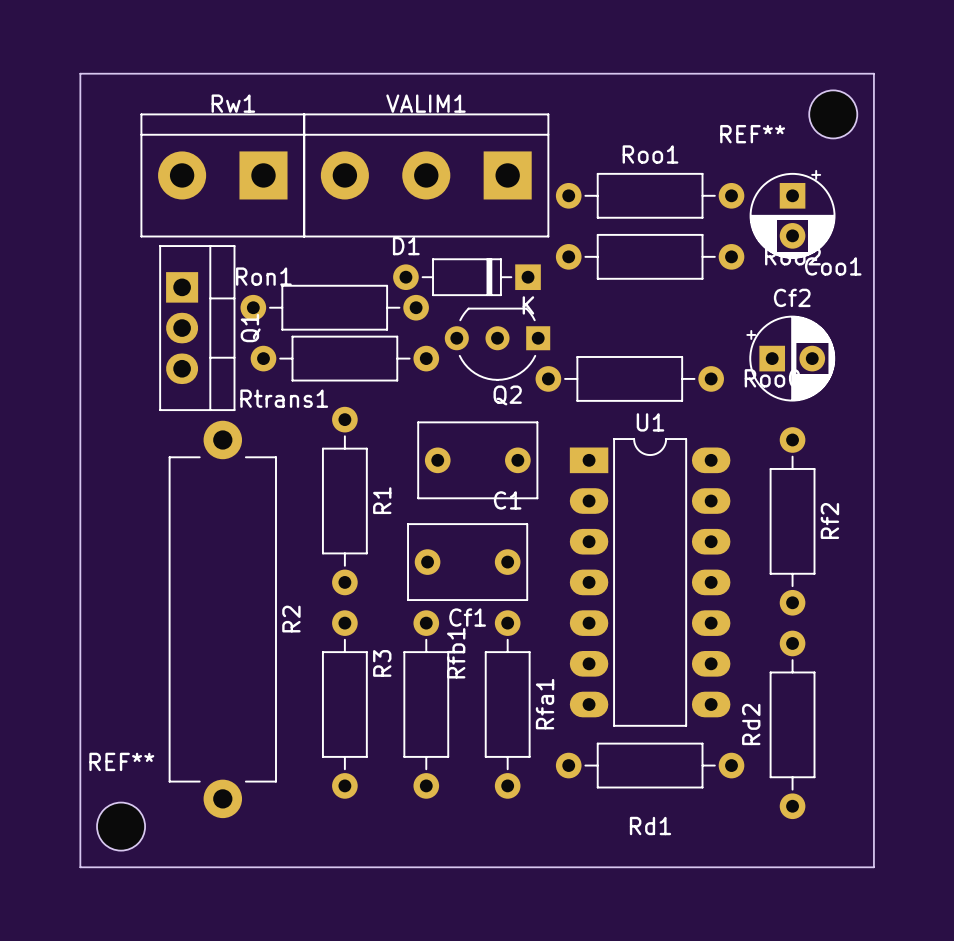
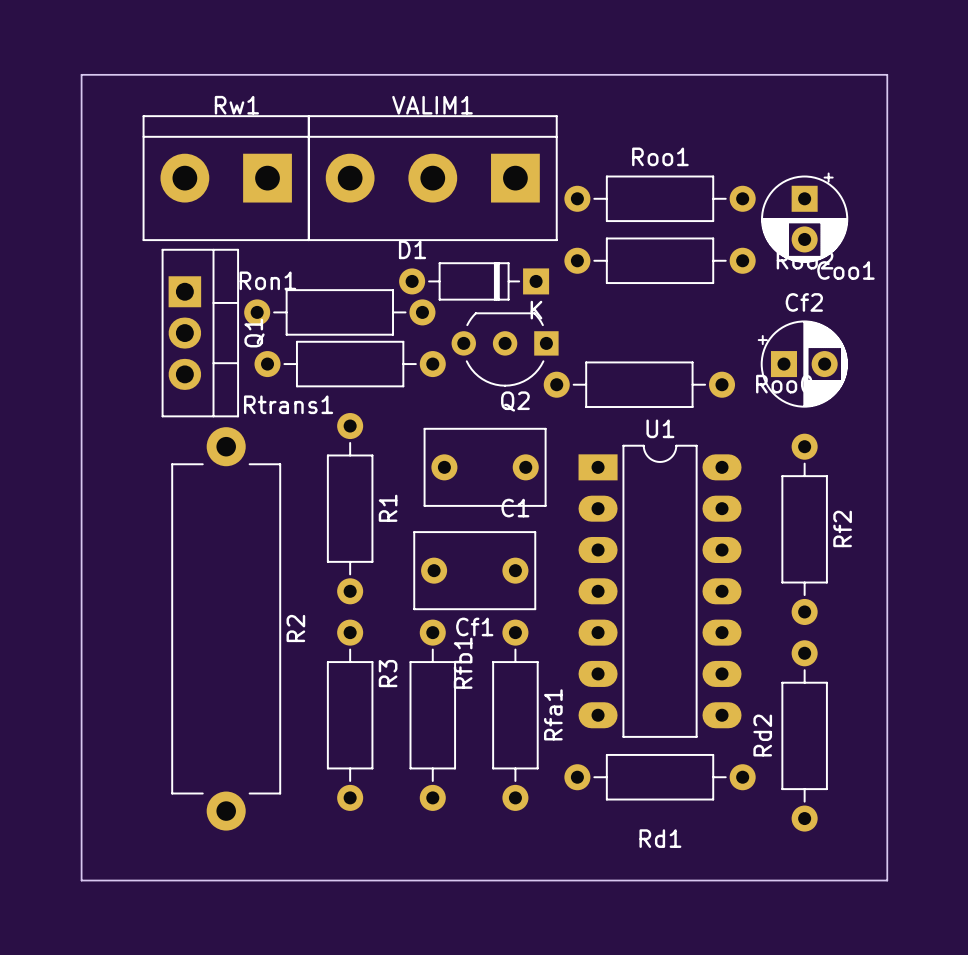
REF**: (833, 114) -> none
REF**: (121, 826) -> none

